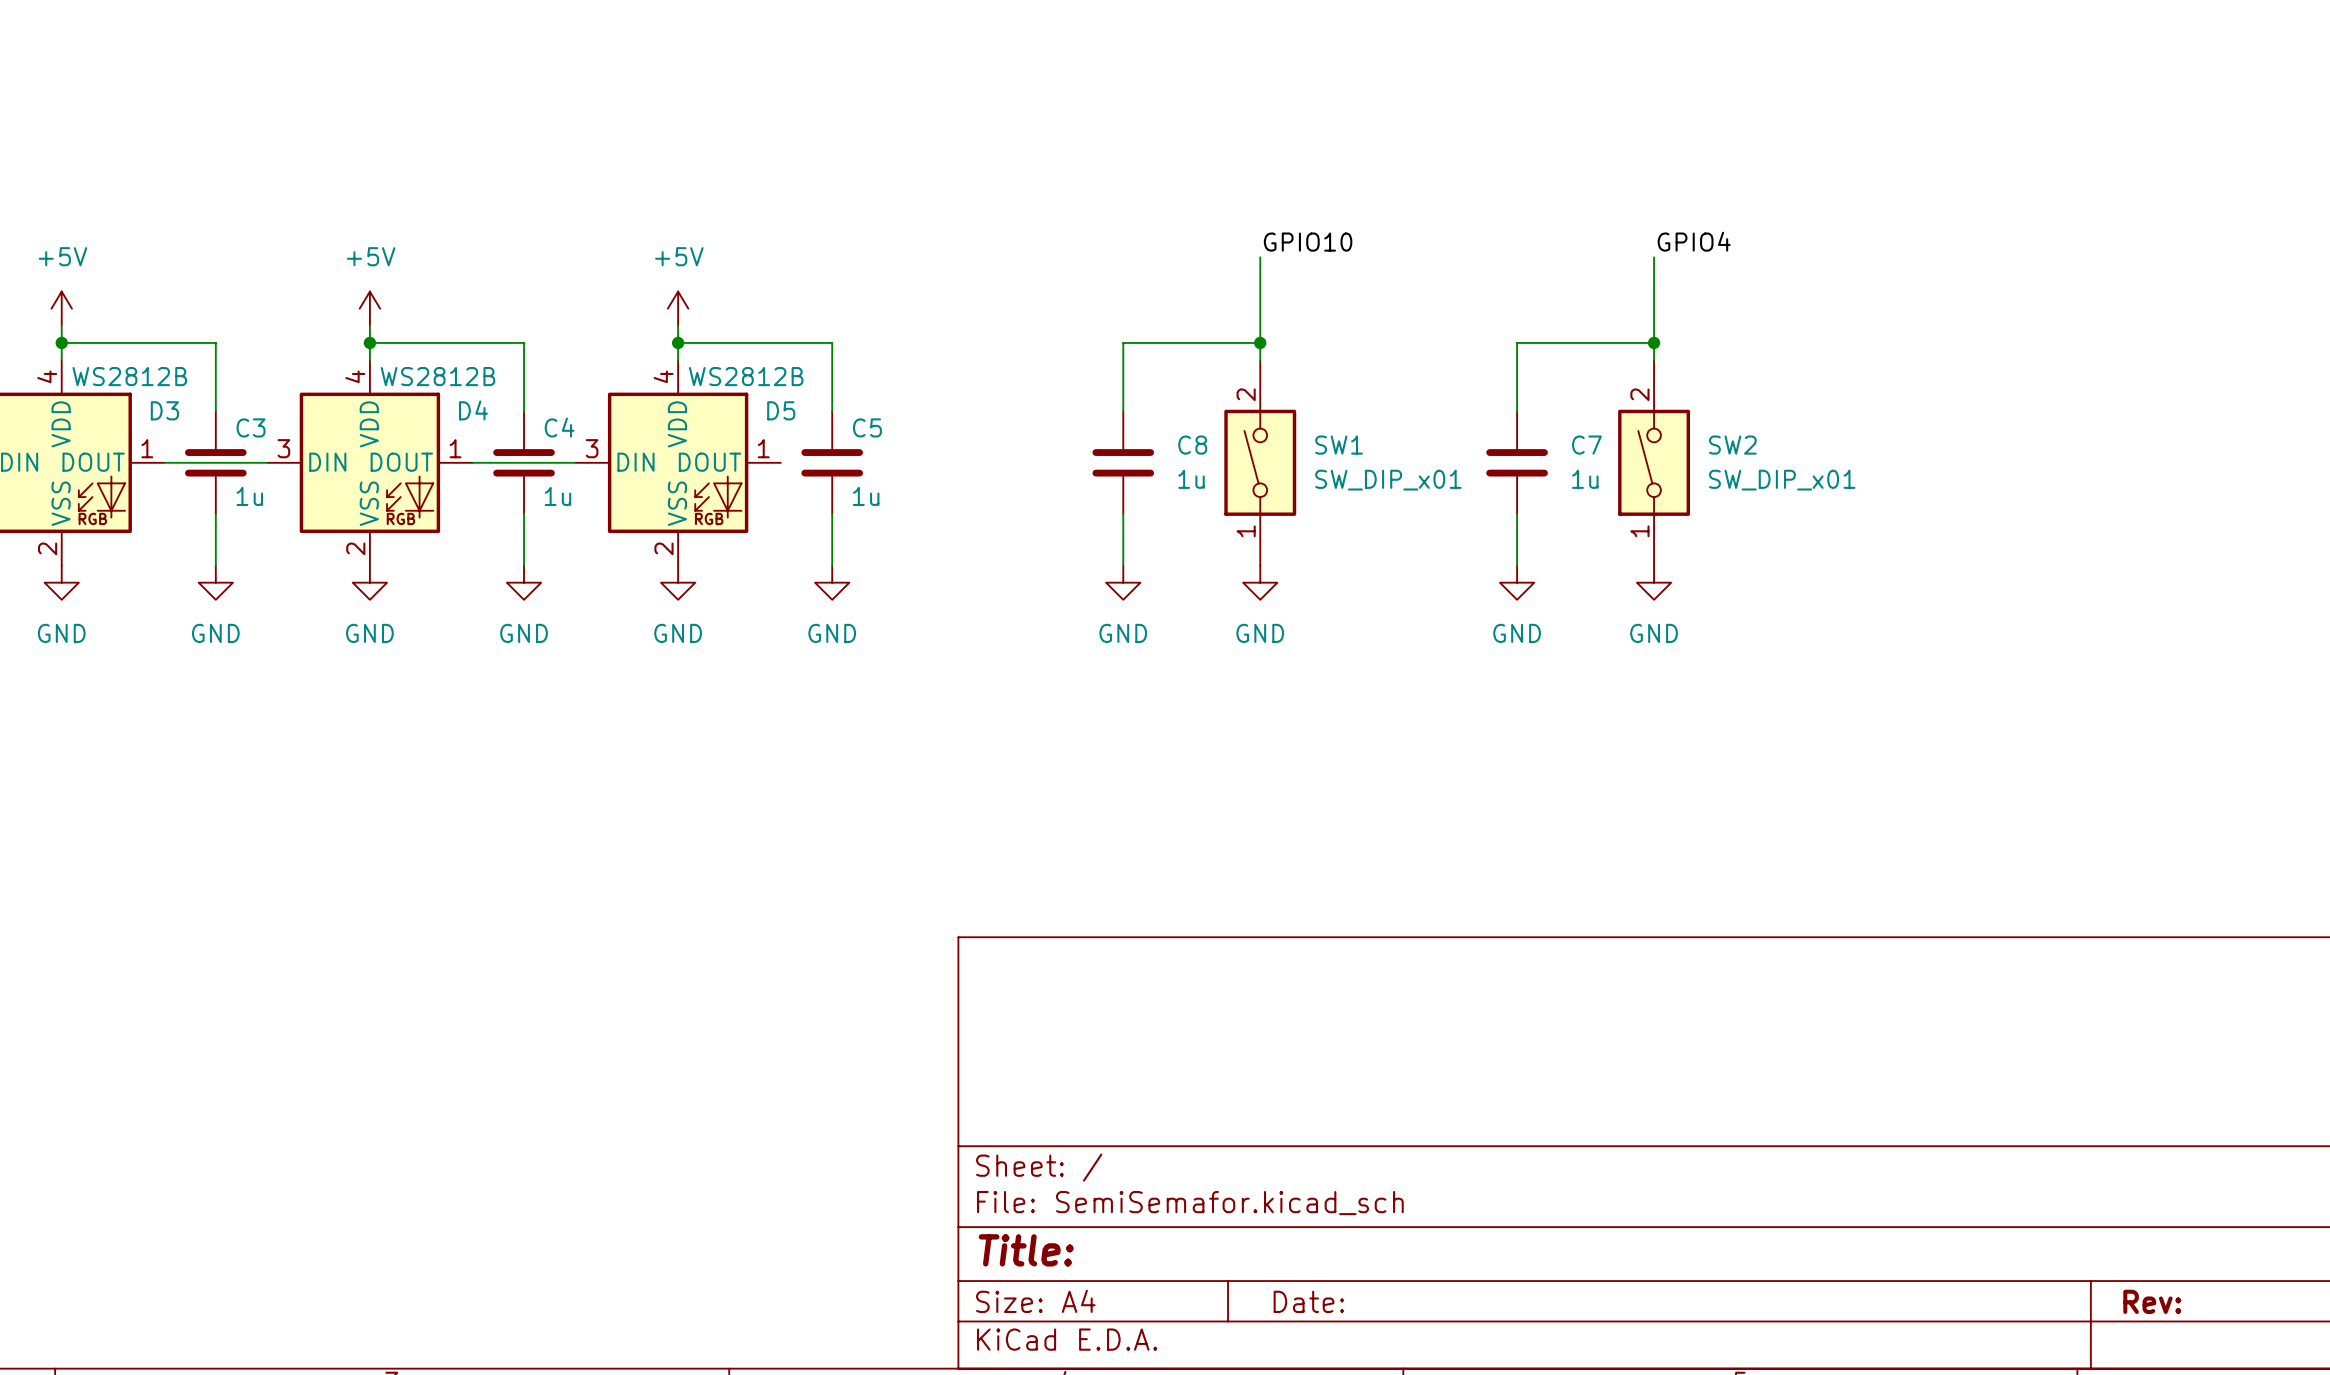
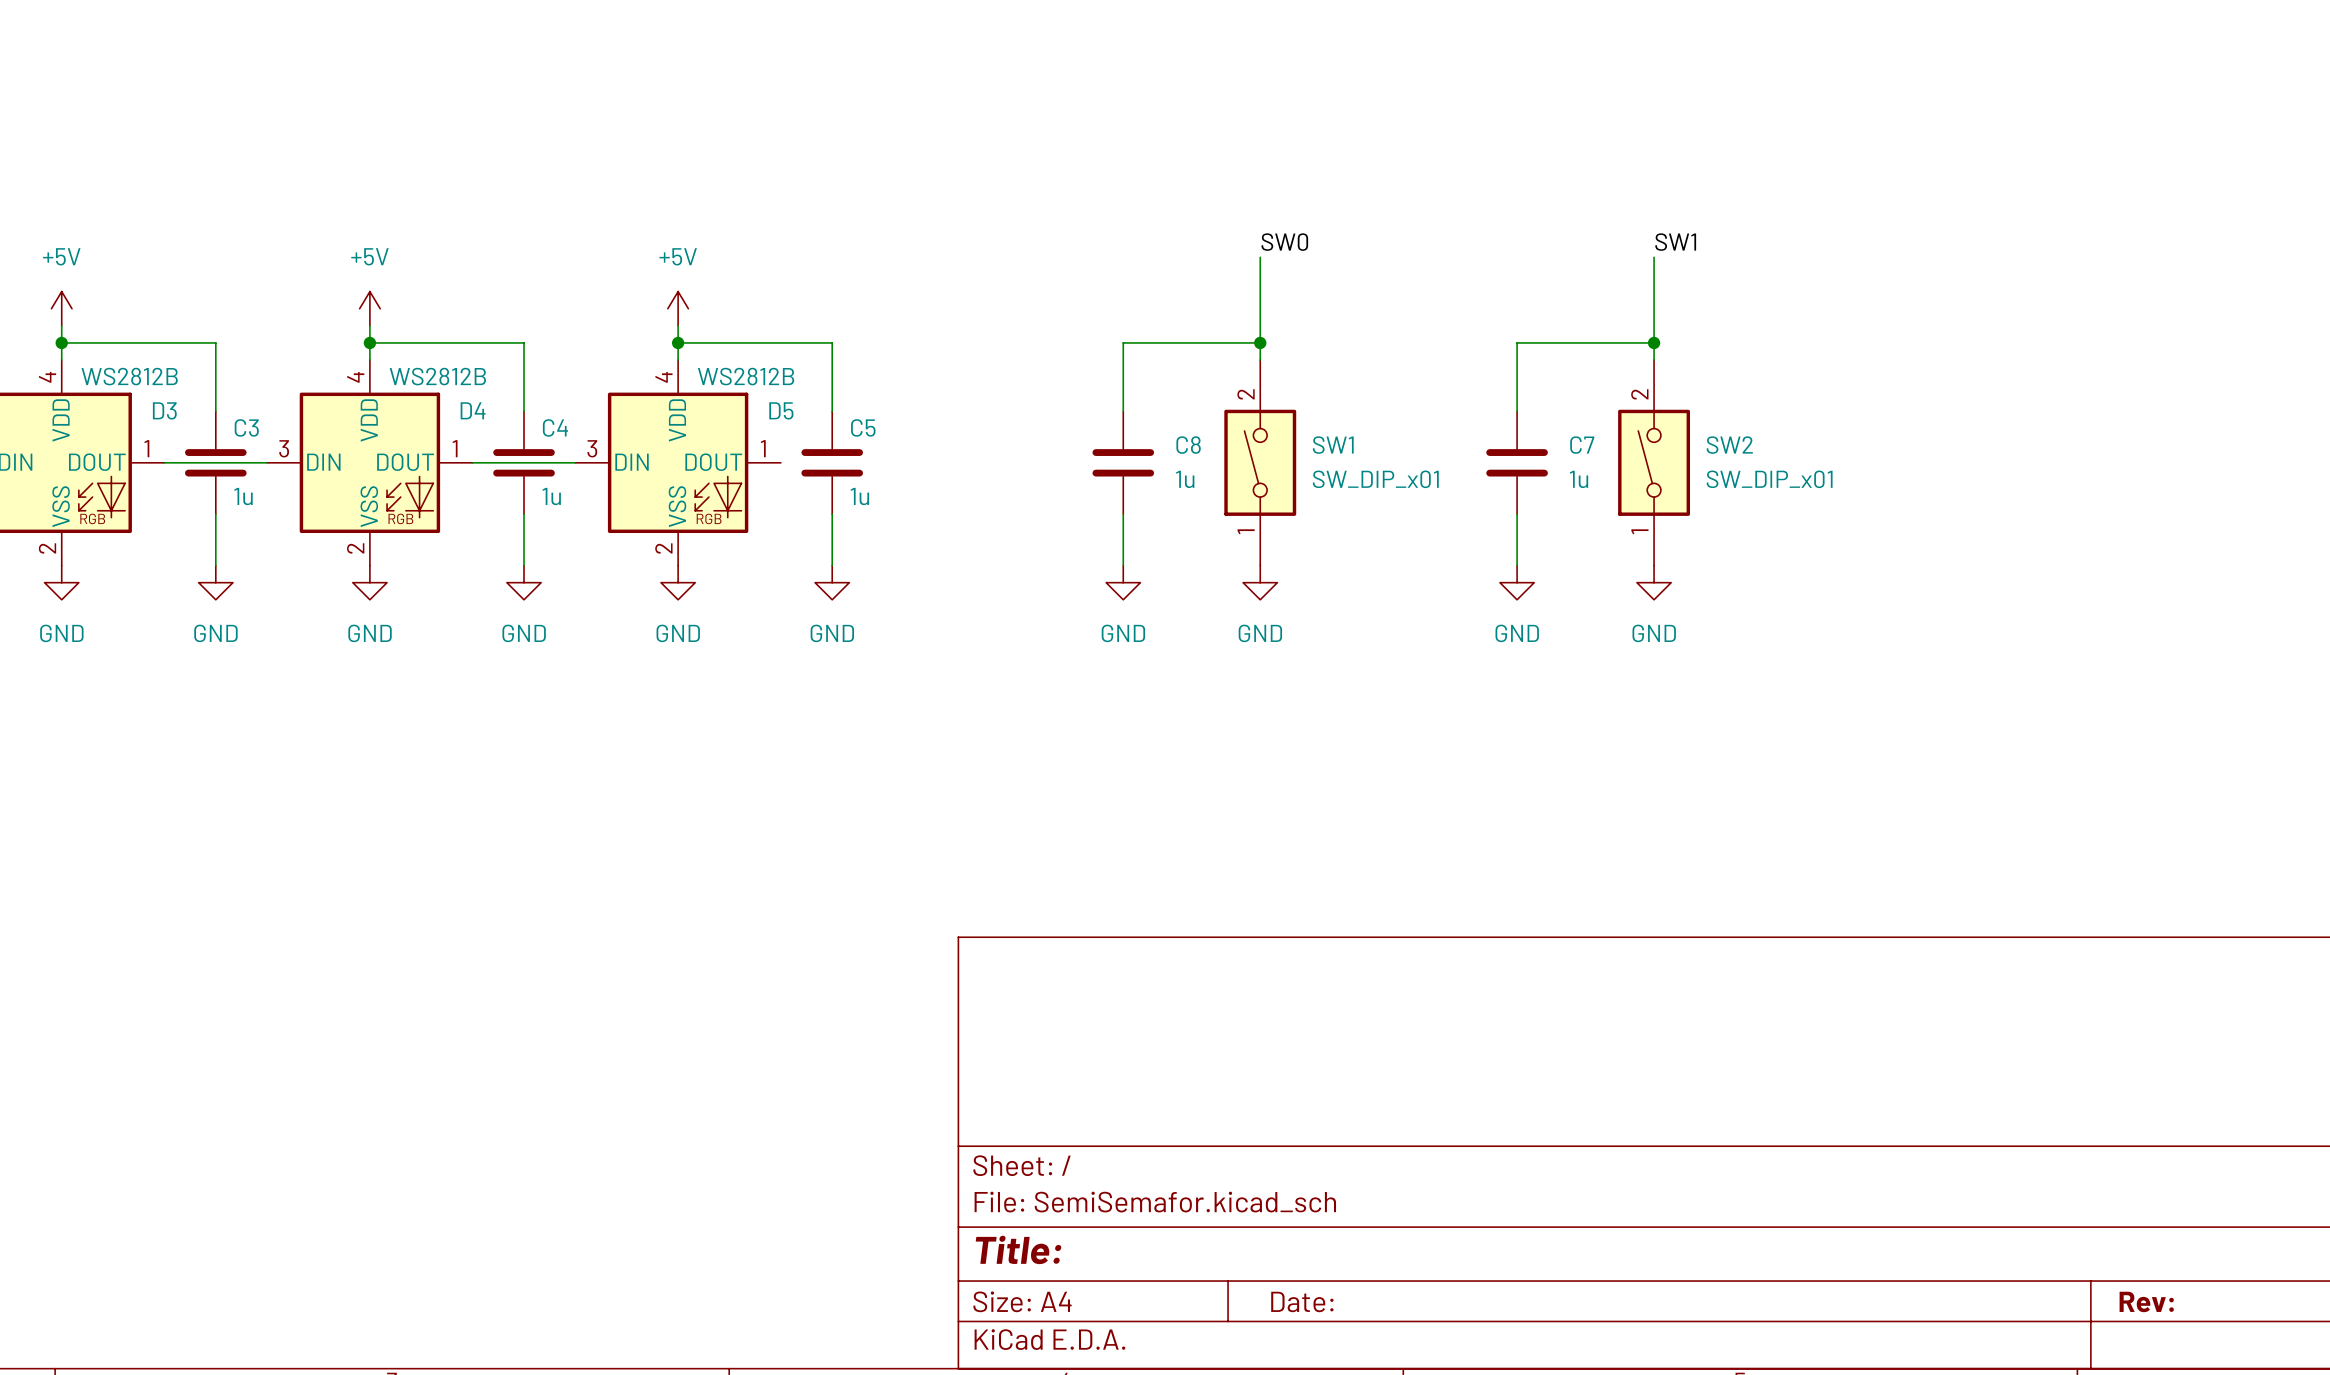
label: GPIO4 (1694, 241) -> SW1 (1675, 242)
label: GPIO10 (1308, 242) -> SW0 (1284, 242)

